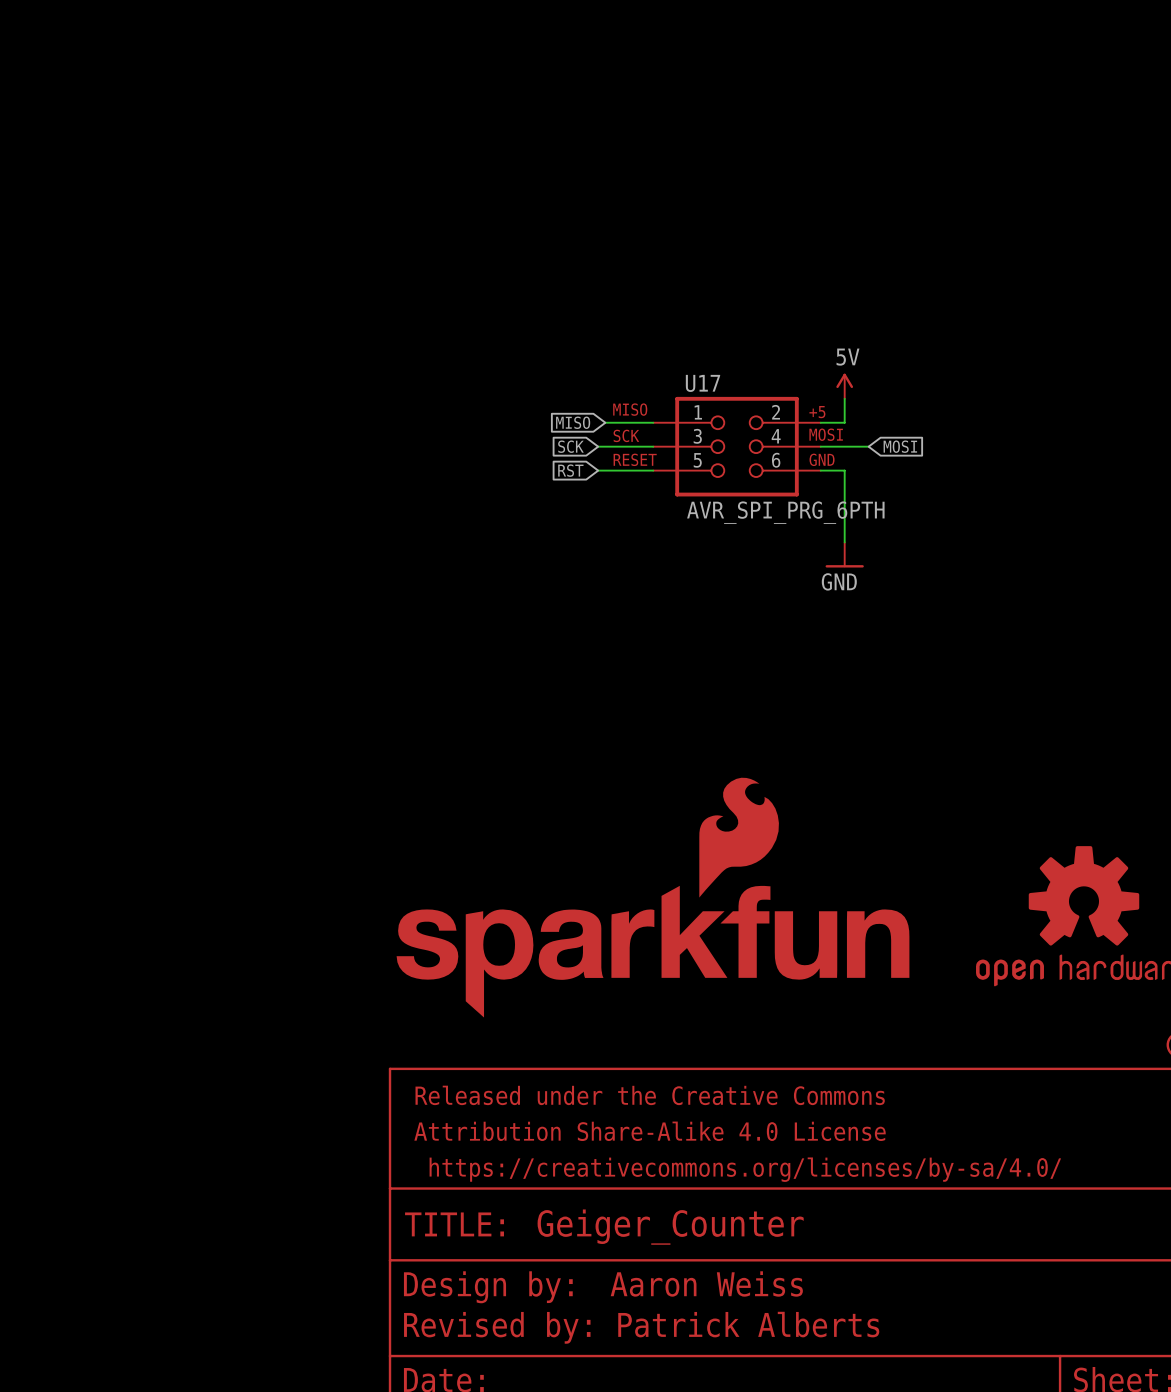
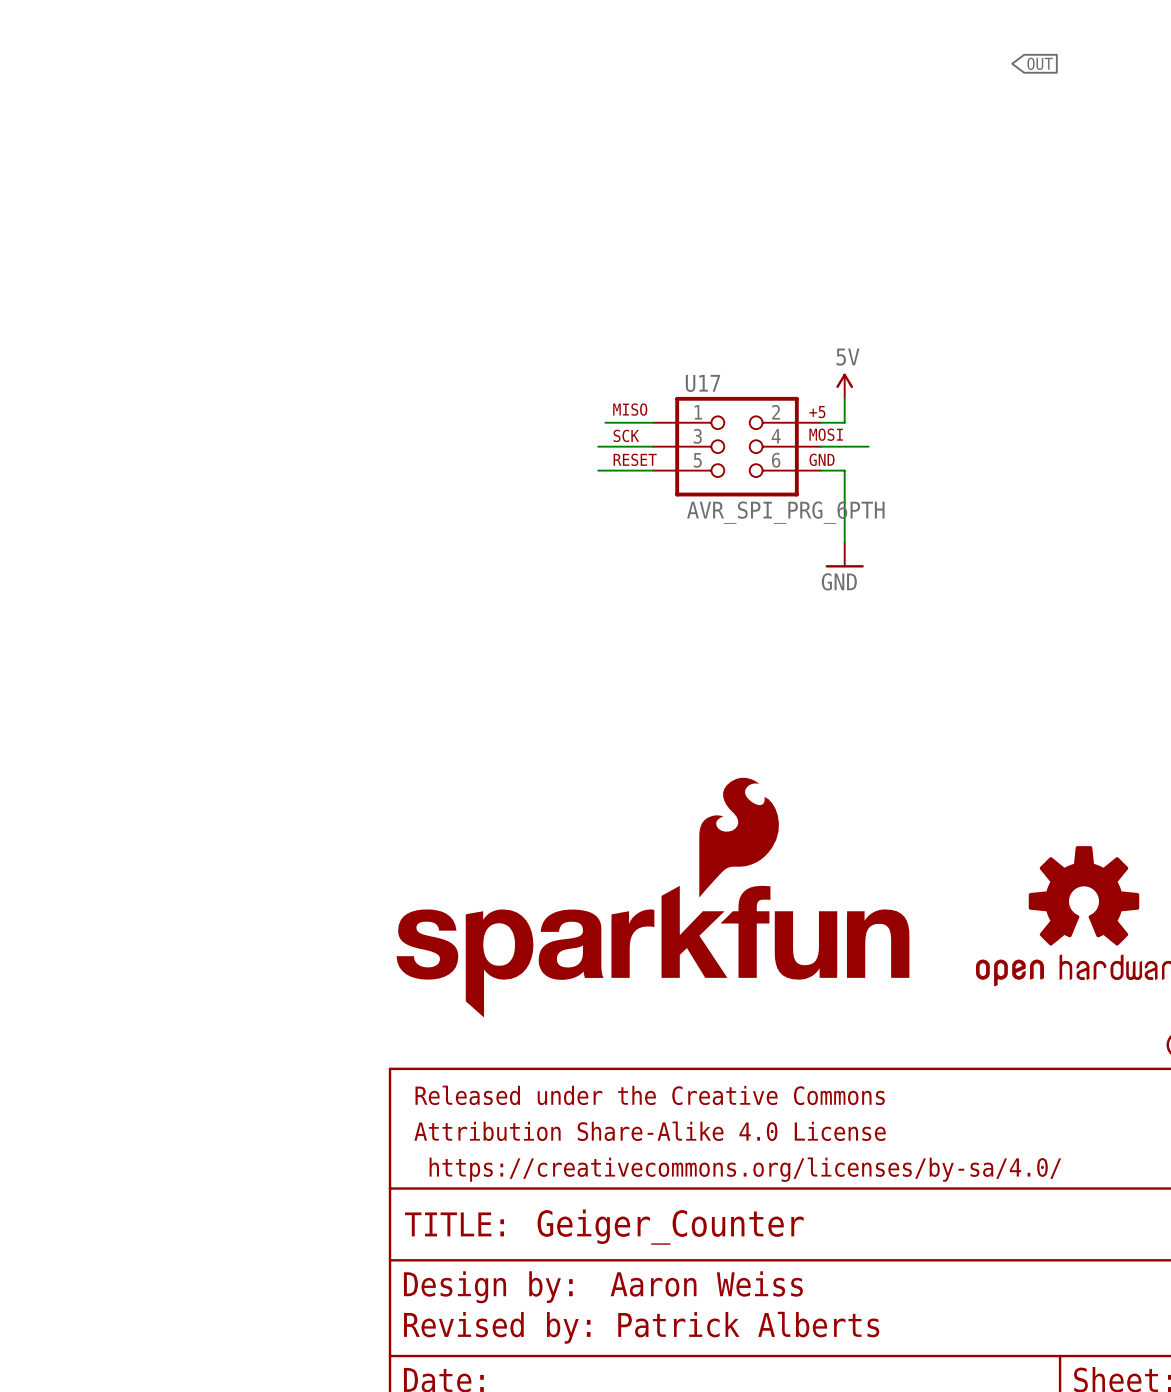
global label: none -> OUT (1040, 63)
global label: MISO (573, 422) -> none
global label: SCK (570, 446) -> none
global label: MOSI (900, 446) -> none
global label: RST (570, 470) -> none

